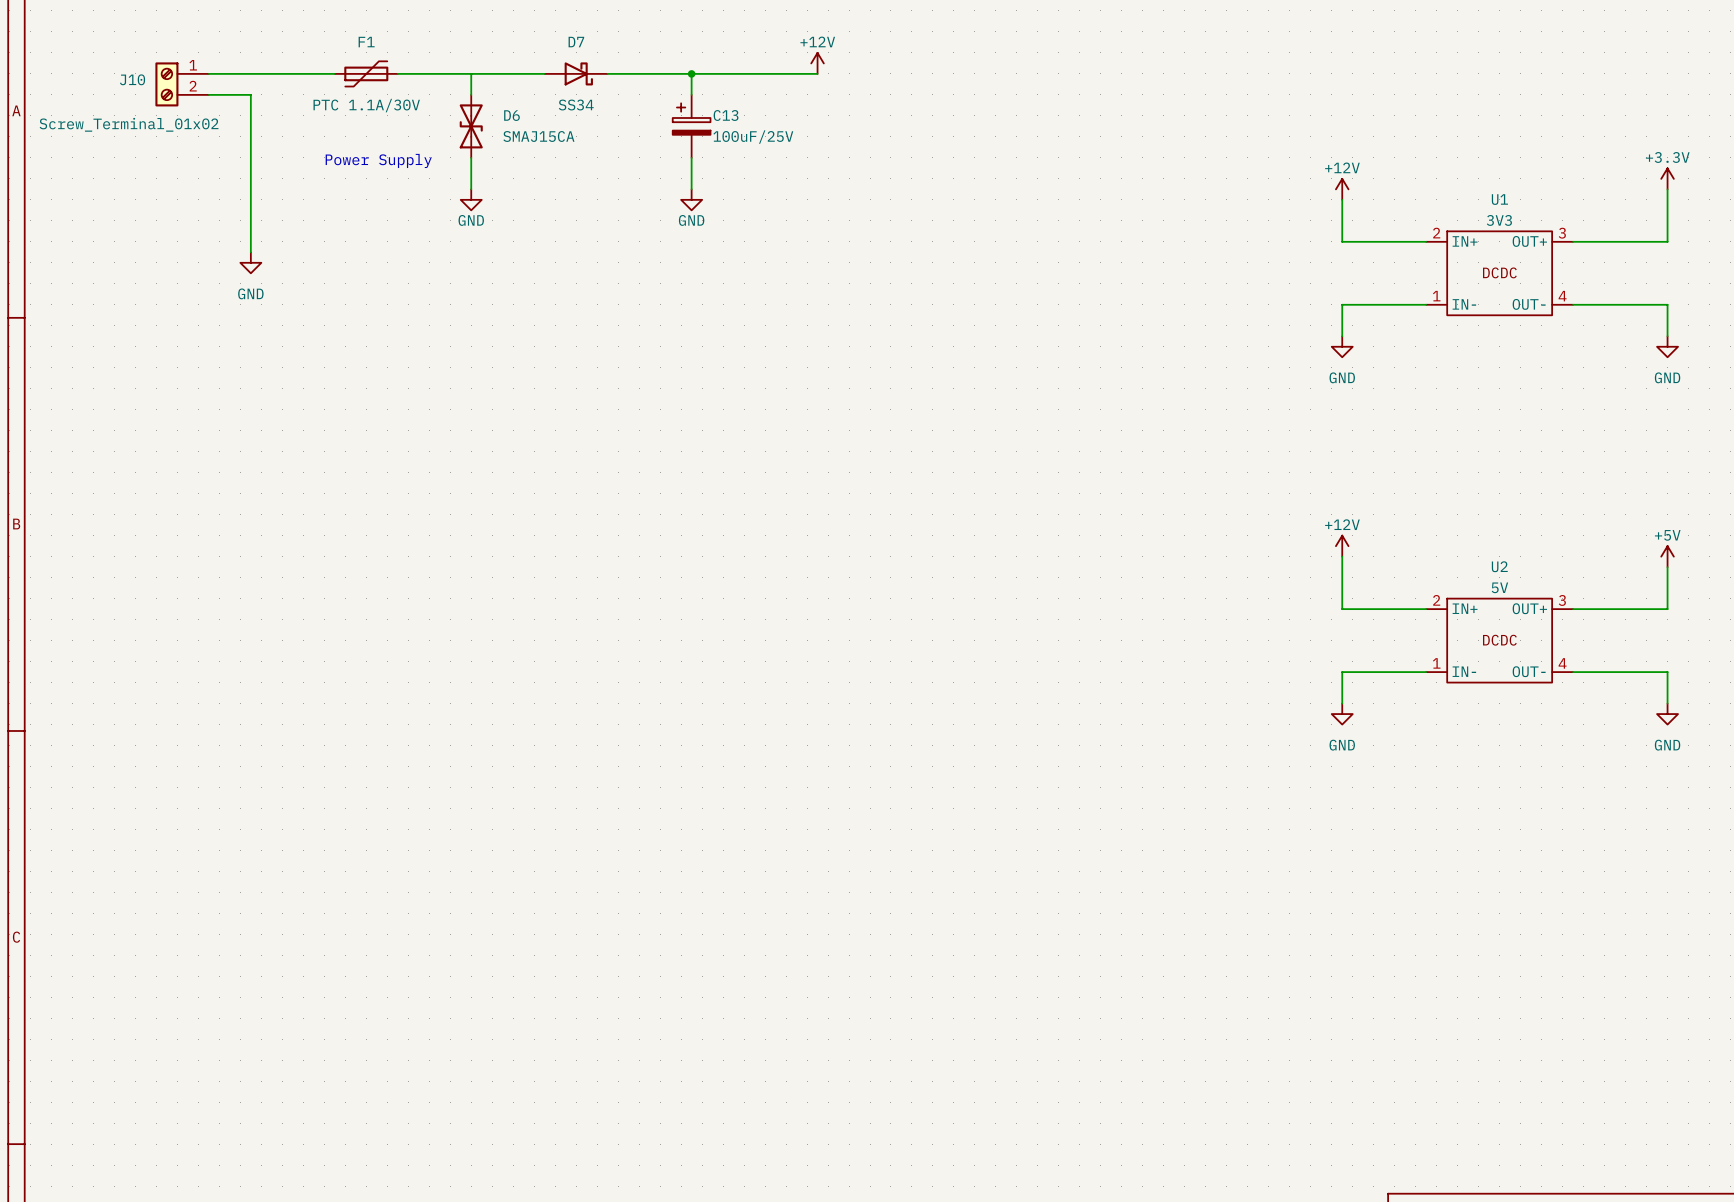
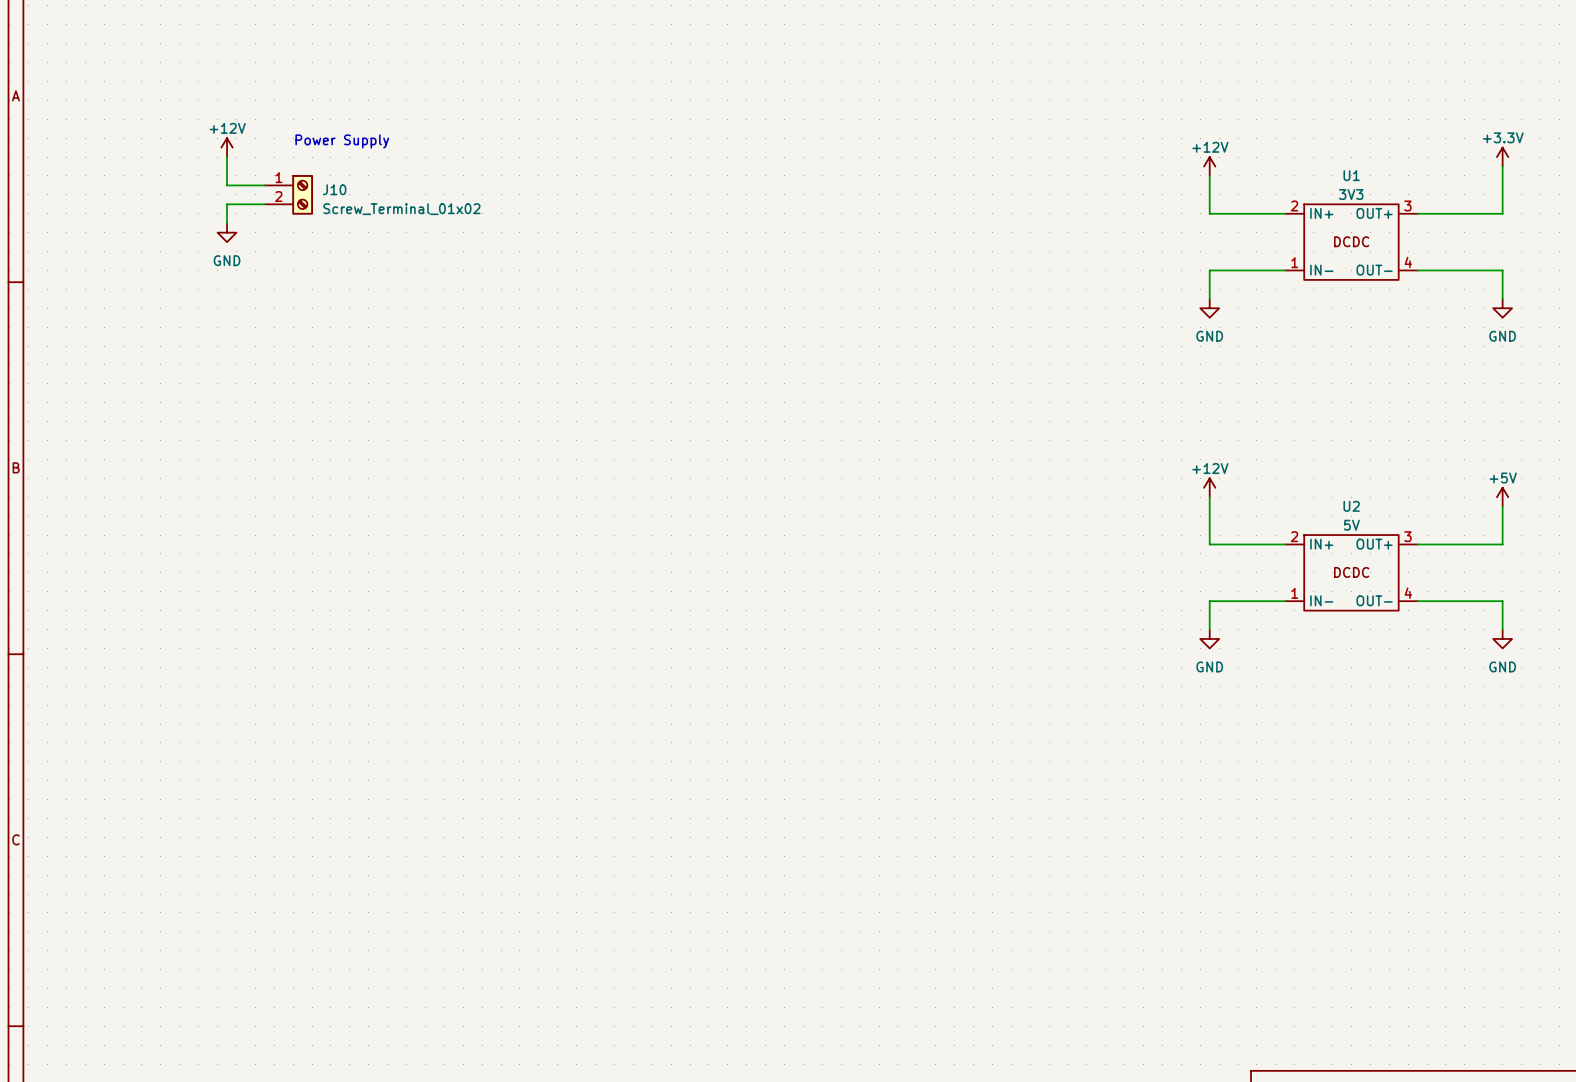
power symbol: +12V (817, 63) -> none
wire: (208, 73) (334, 73) -> none
F1: PTC 1.1A/30V (366, 73) -> none
wire: (397, 73) (544, 73) -> none
wire: (471, 73) (471, 94) -> none
D7: SS34 (576, 73) -> none
wire: (607, 73) (817, 73) -> none
wire: (691, 73) (691, 94) -> none
junction: (691, 73) -> none
J10 flip: as is (166, 84) -> left-right (302, 194)
J10 position: (182, 84) -> (288, 194)
wire: (208, 94) (250, 94) (250, 178) -> none
J10 value position: Screw_Terminal_01x02 (129, 124) -> Screw_Terminal_01x02 (401, 209)
D6: SMAJ15CA (471, 126) -> none
C13: 100uF/25V (691, 126) -> none
wire: (471, 157) (471, 189) -> none
wire: (691, 157) (691, 189) -> none
power symbol: none -> +12V (227, 147)
power symbol: GND (471, 199) -> none
power symbol: GND (691, 199) -> none
wire: (250, 210) (250, 231) -> (227, 185) (264, 185)
wire: none -> (227, 204) (264, 204)

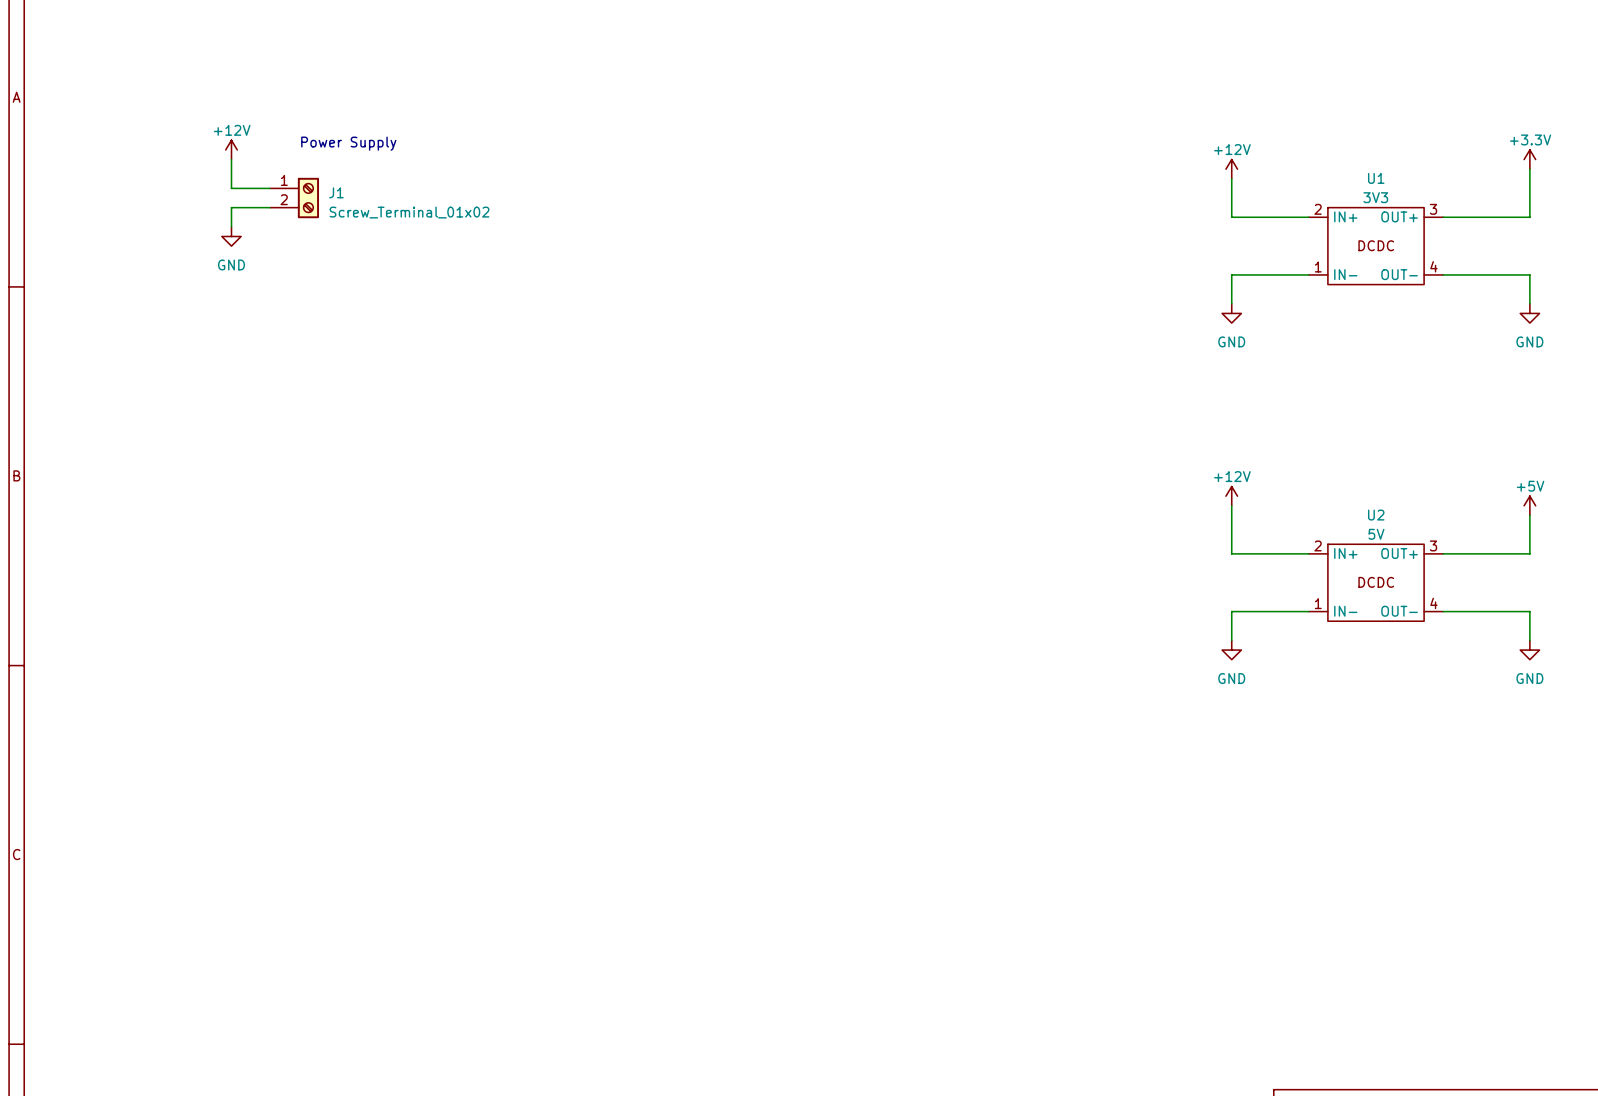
J10 name: J10 (334, 189) -> J1 (336, 192)

